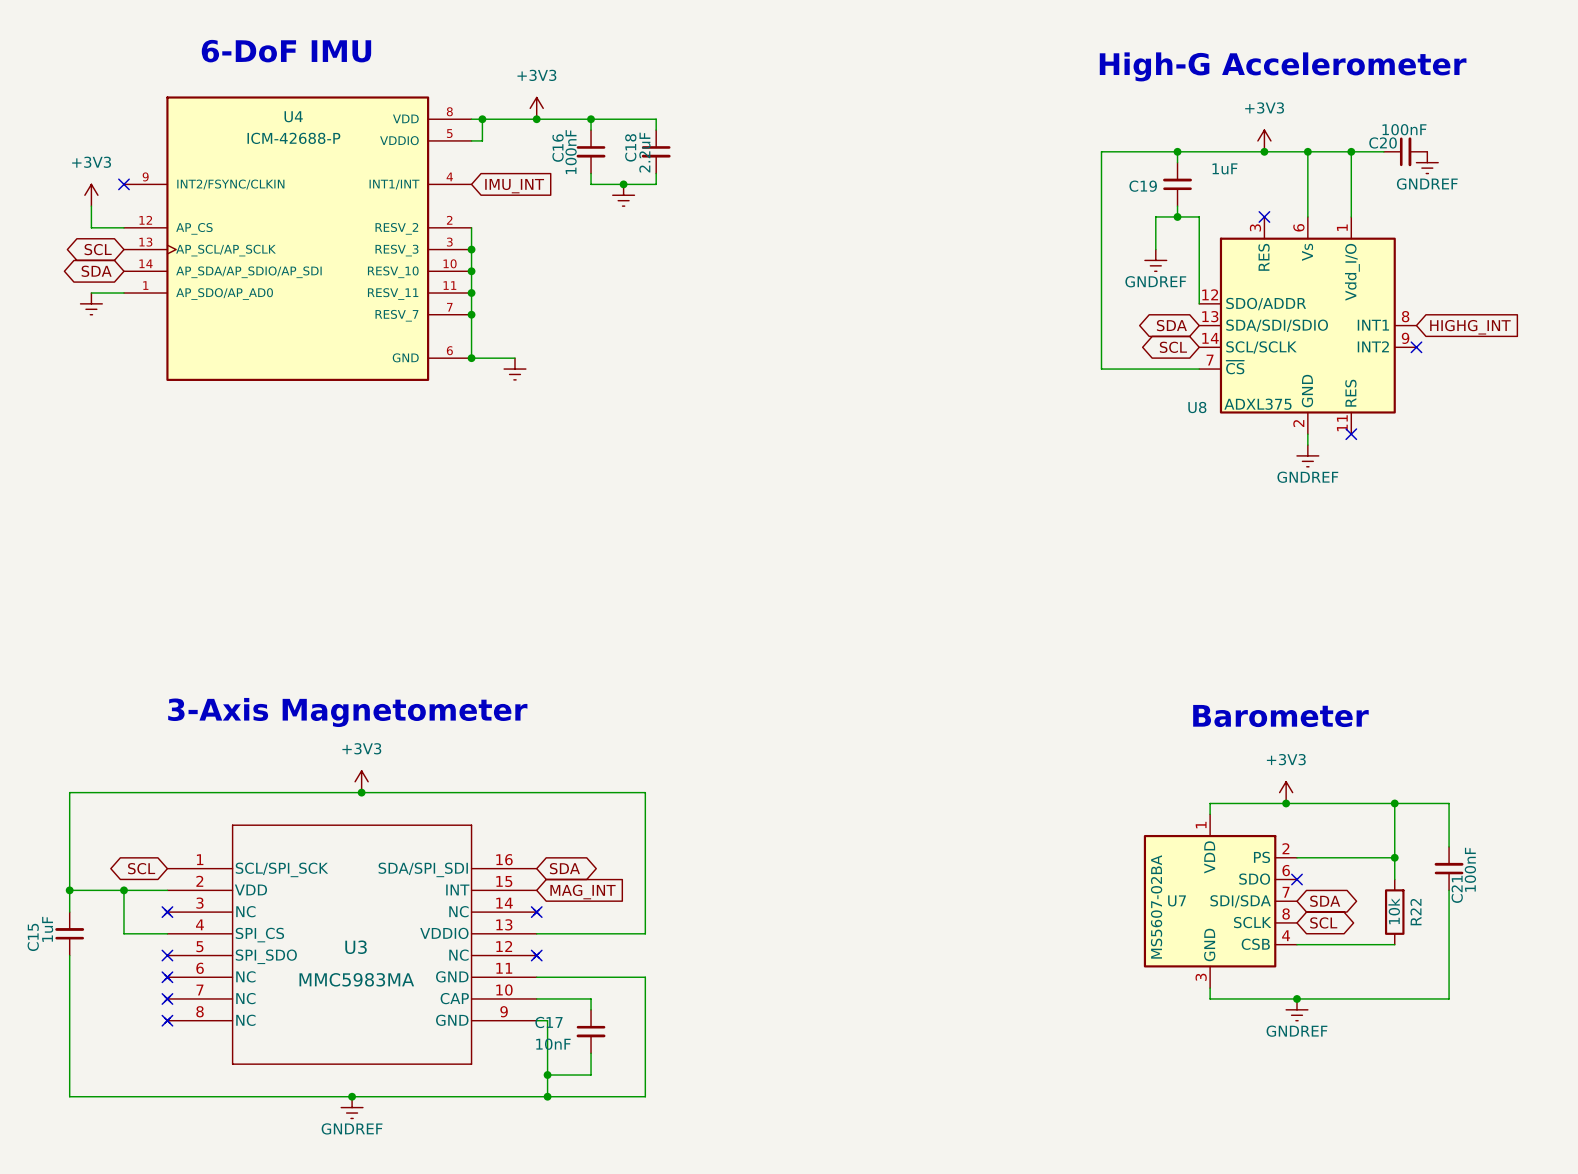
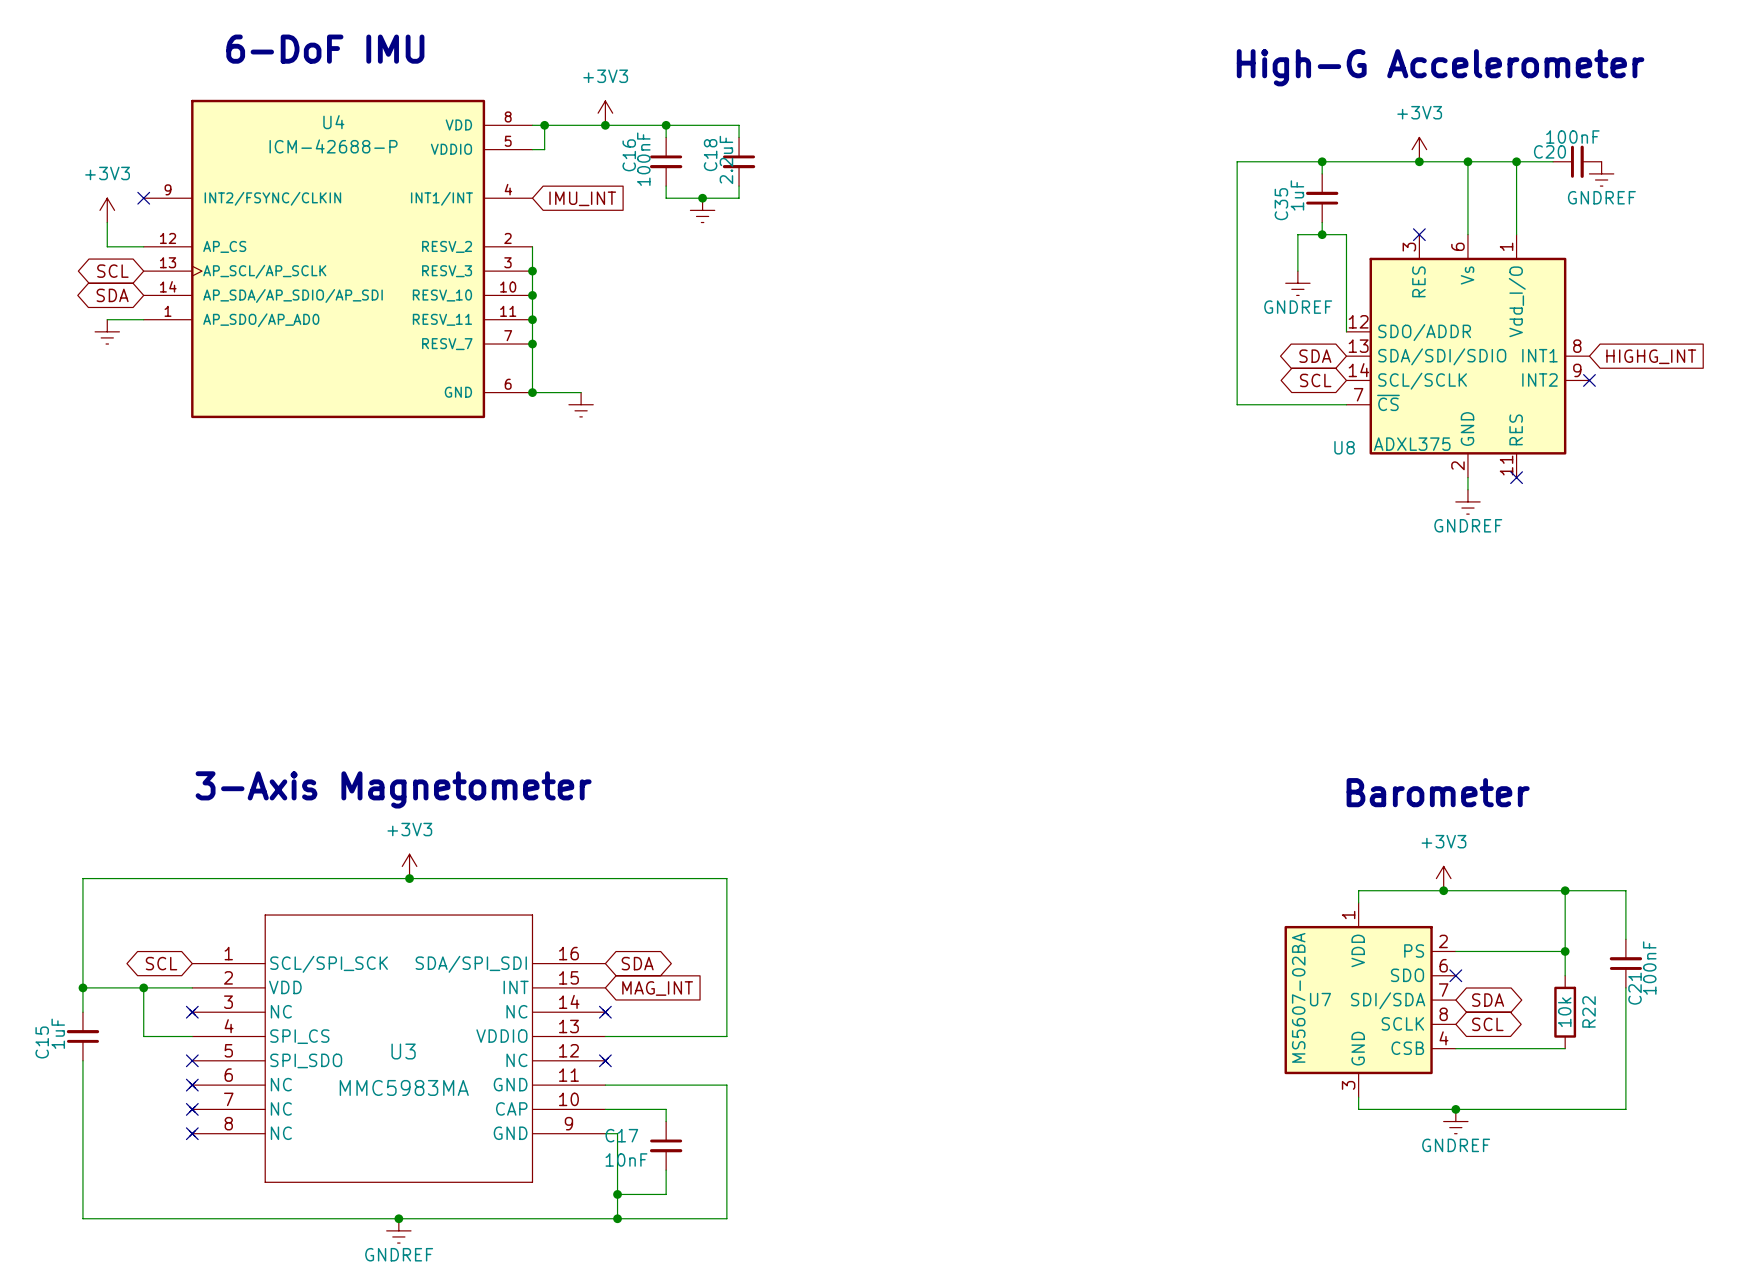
C19 value rotation: 0° (1224, 168) -> 90° counterclockwise (1297, 195)
C19 value position: 1uF (1224, 168) -> 1uF (1297, 195)
C19 name: C19 (1143, 186) -> C35 (1281, 204)

